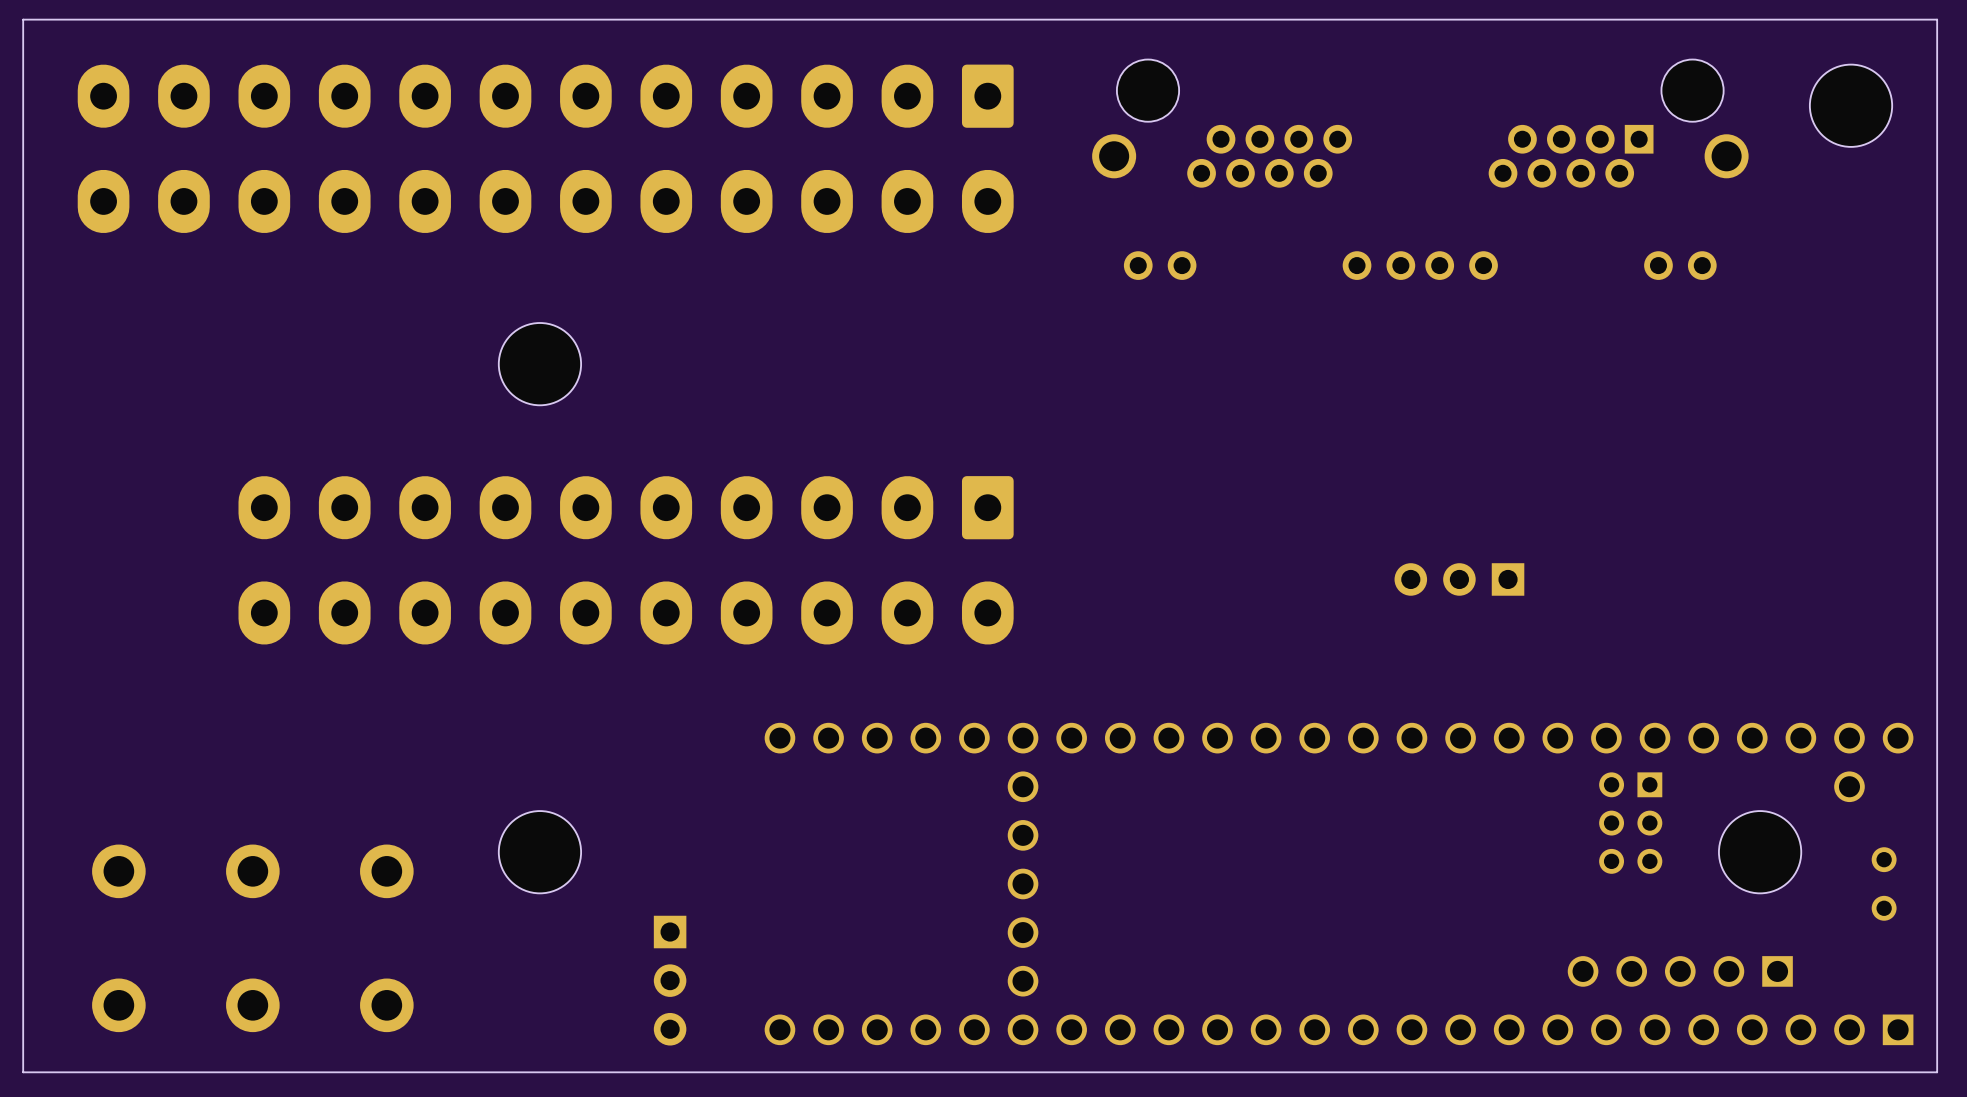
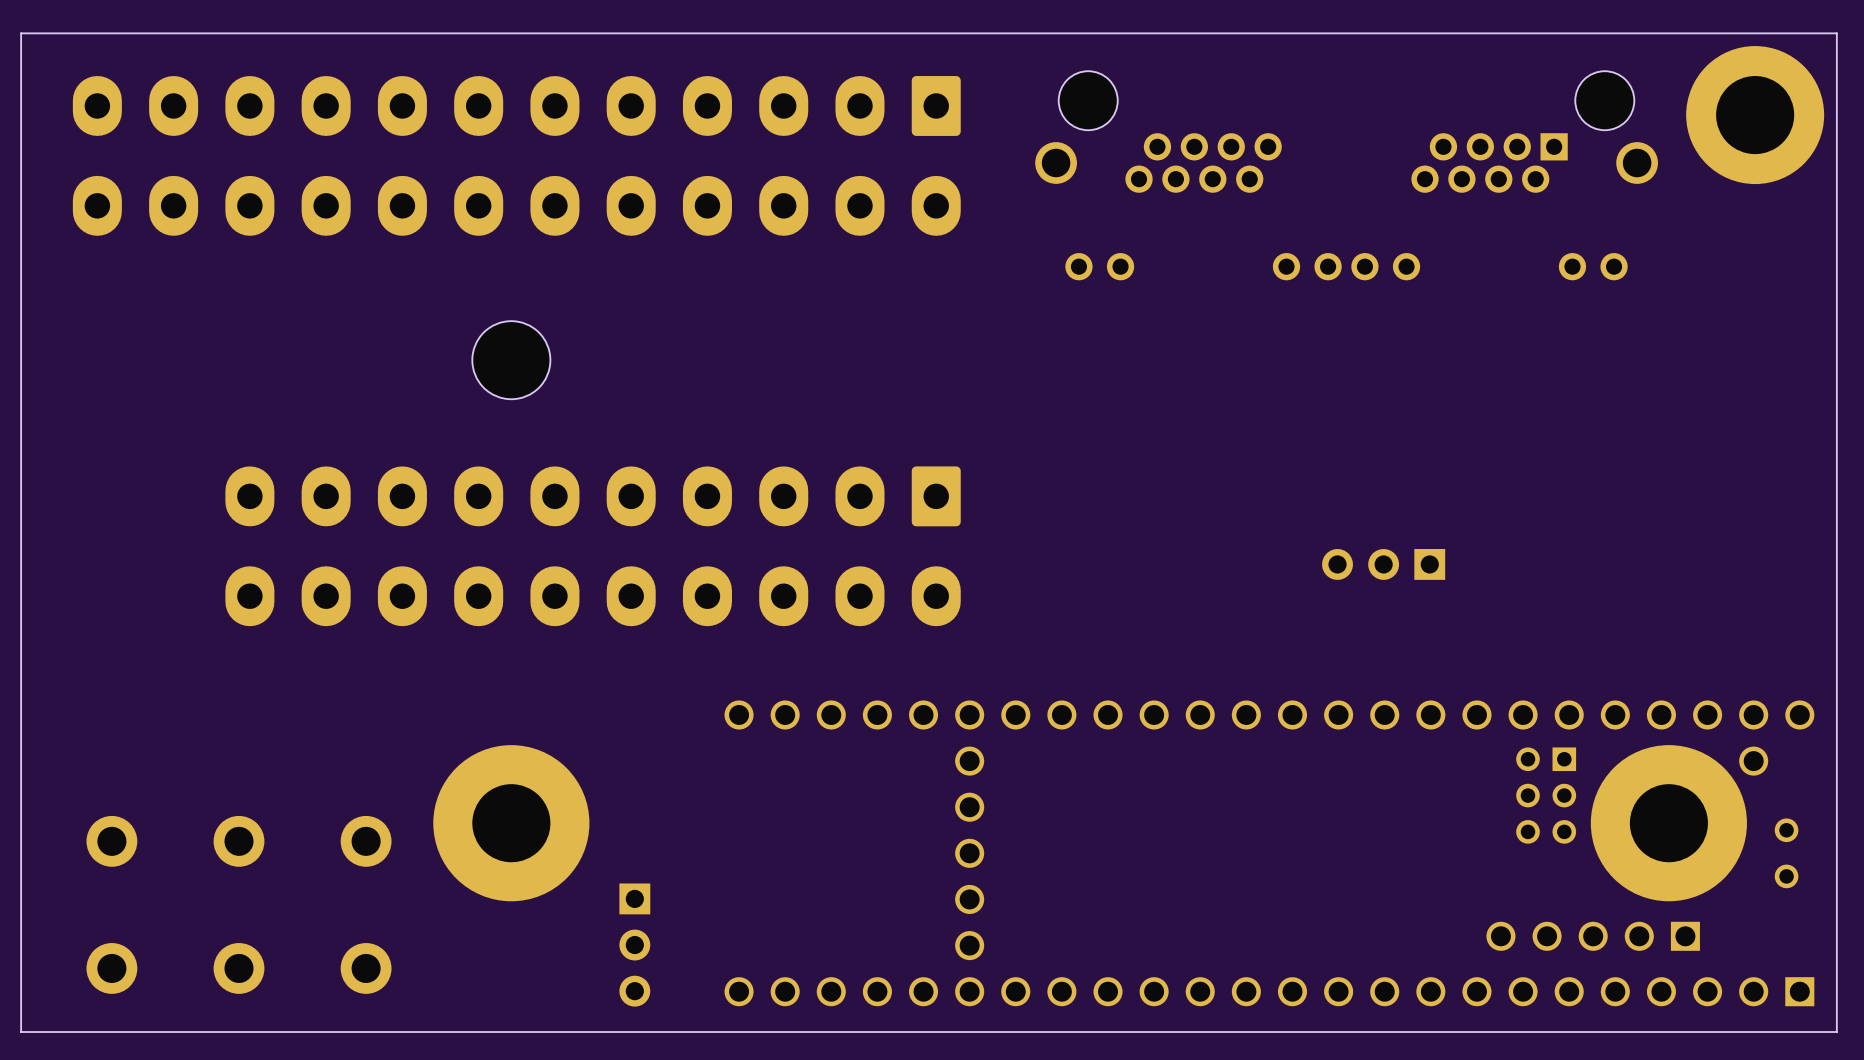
part footprint: [1809, 64, 1893, 147] -> [1686, 46, 1825, 185]
part footprint: [498, 811, 582, 894] -> [433, 745, 590, 902]
part footprint: [1718, 811, 1802, 894] -> [1590, 745, 1747, 902]

